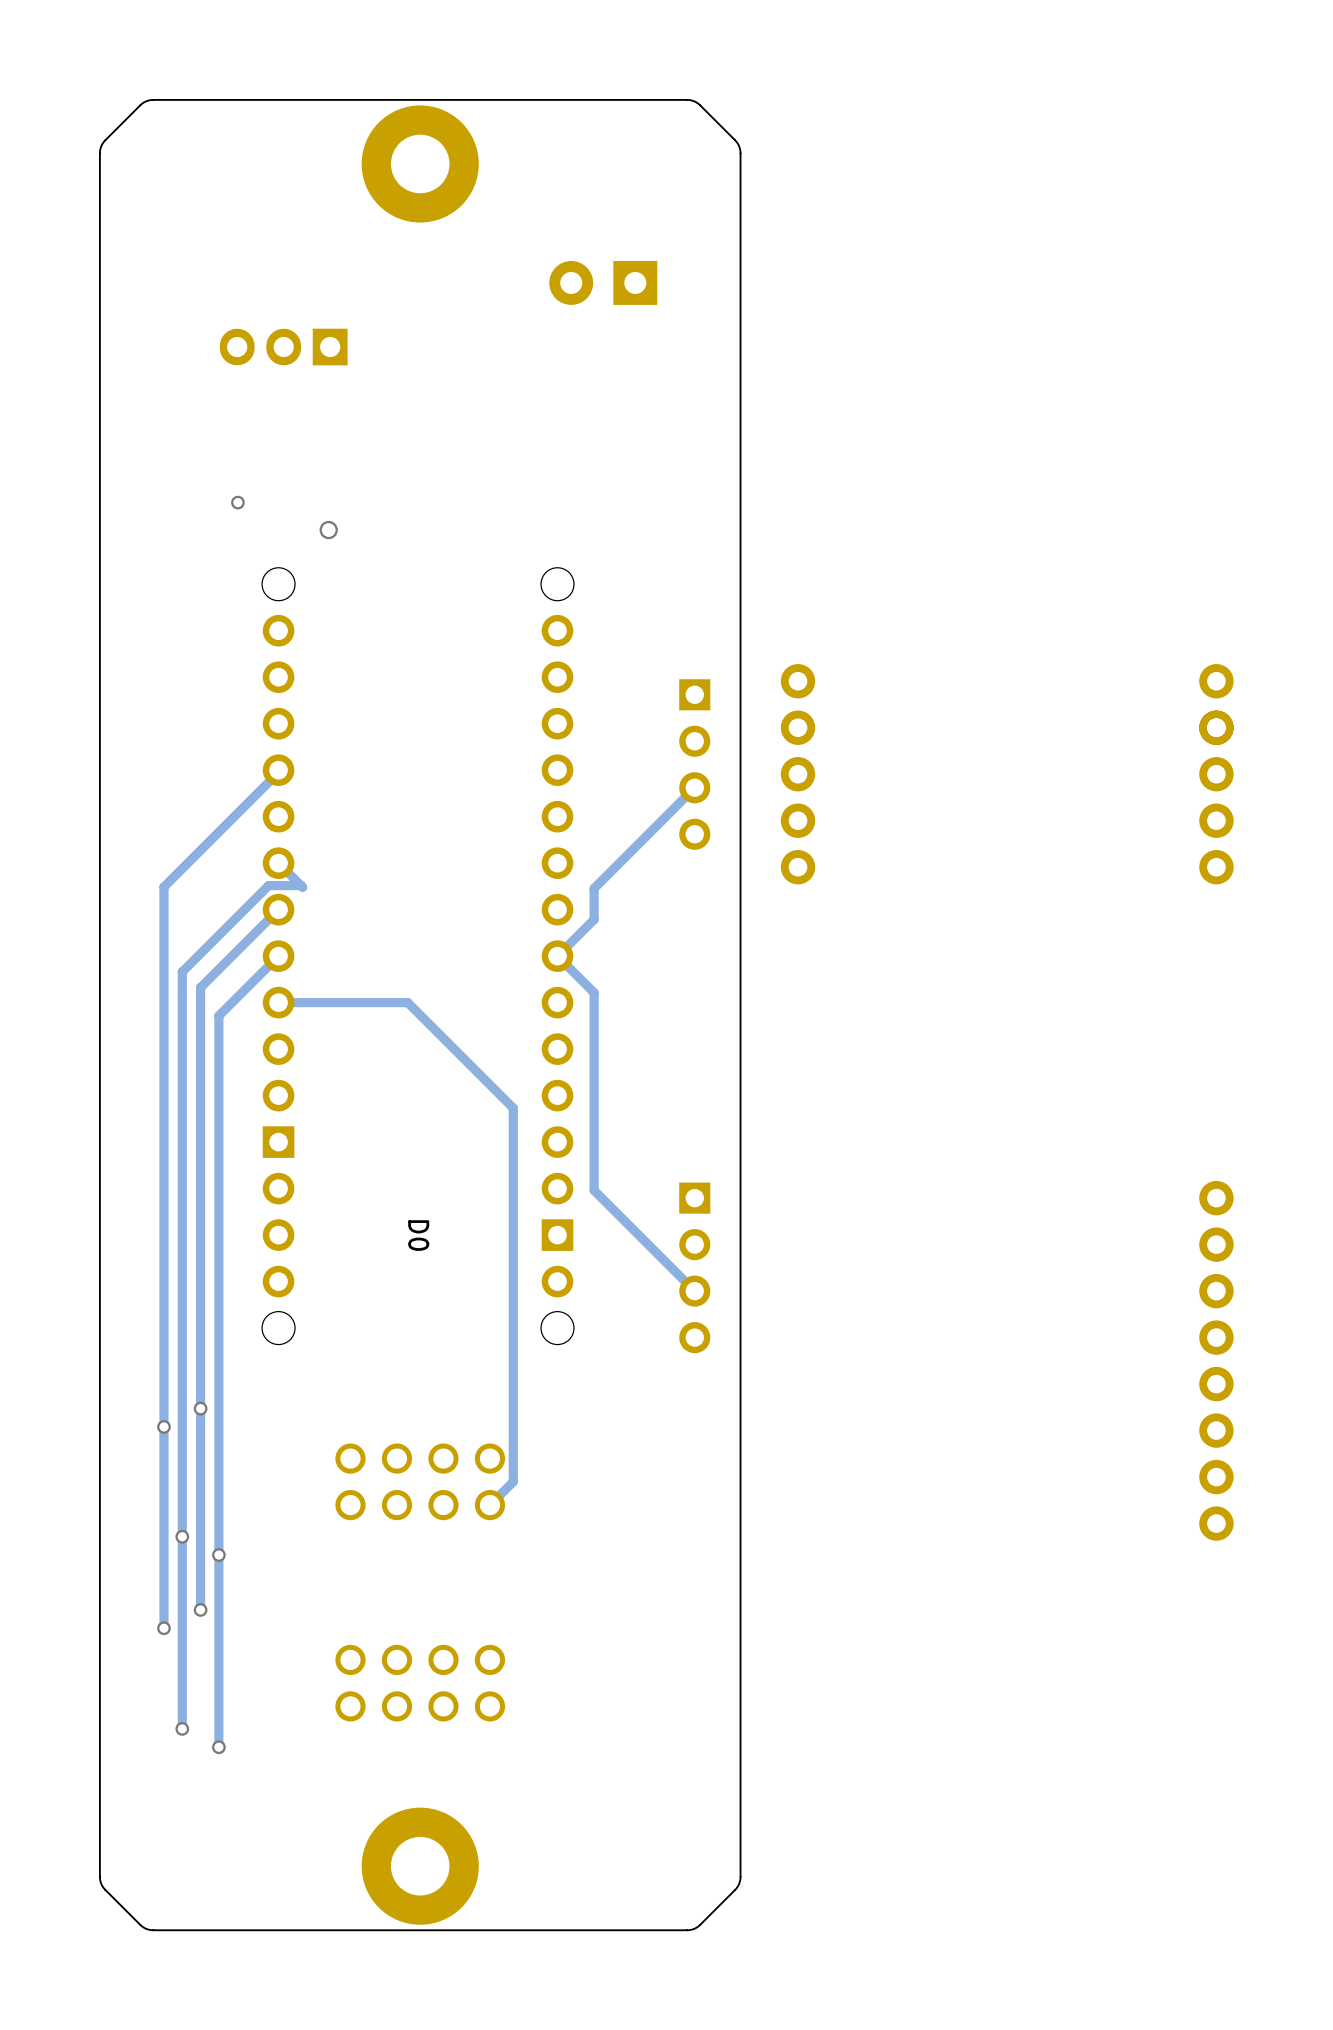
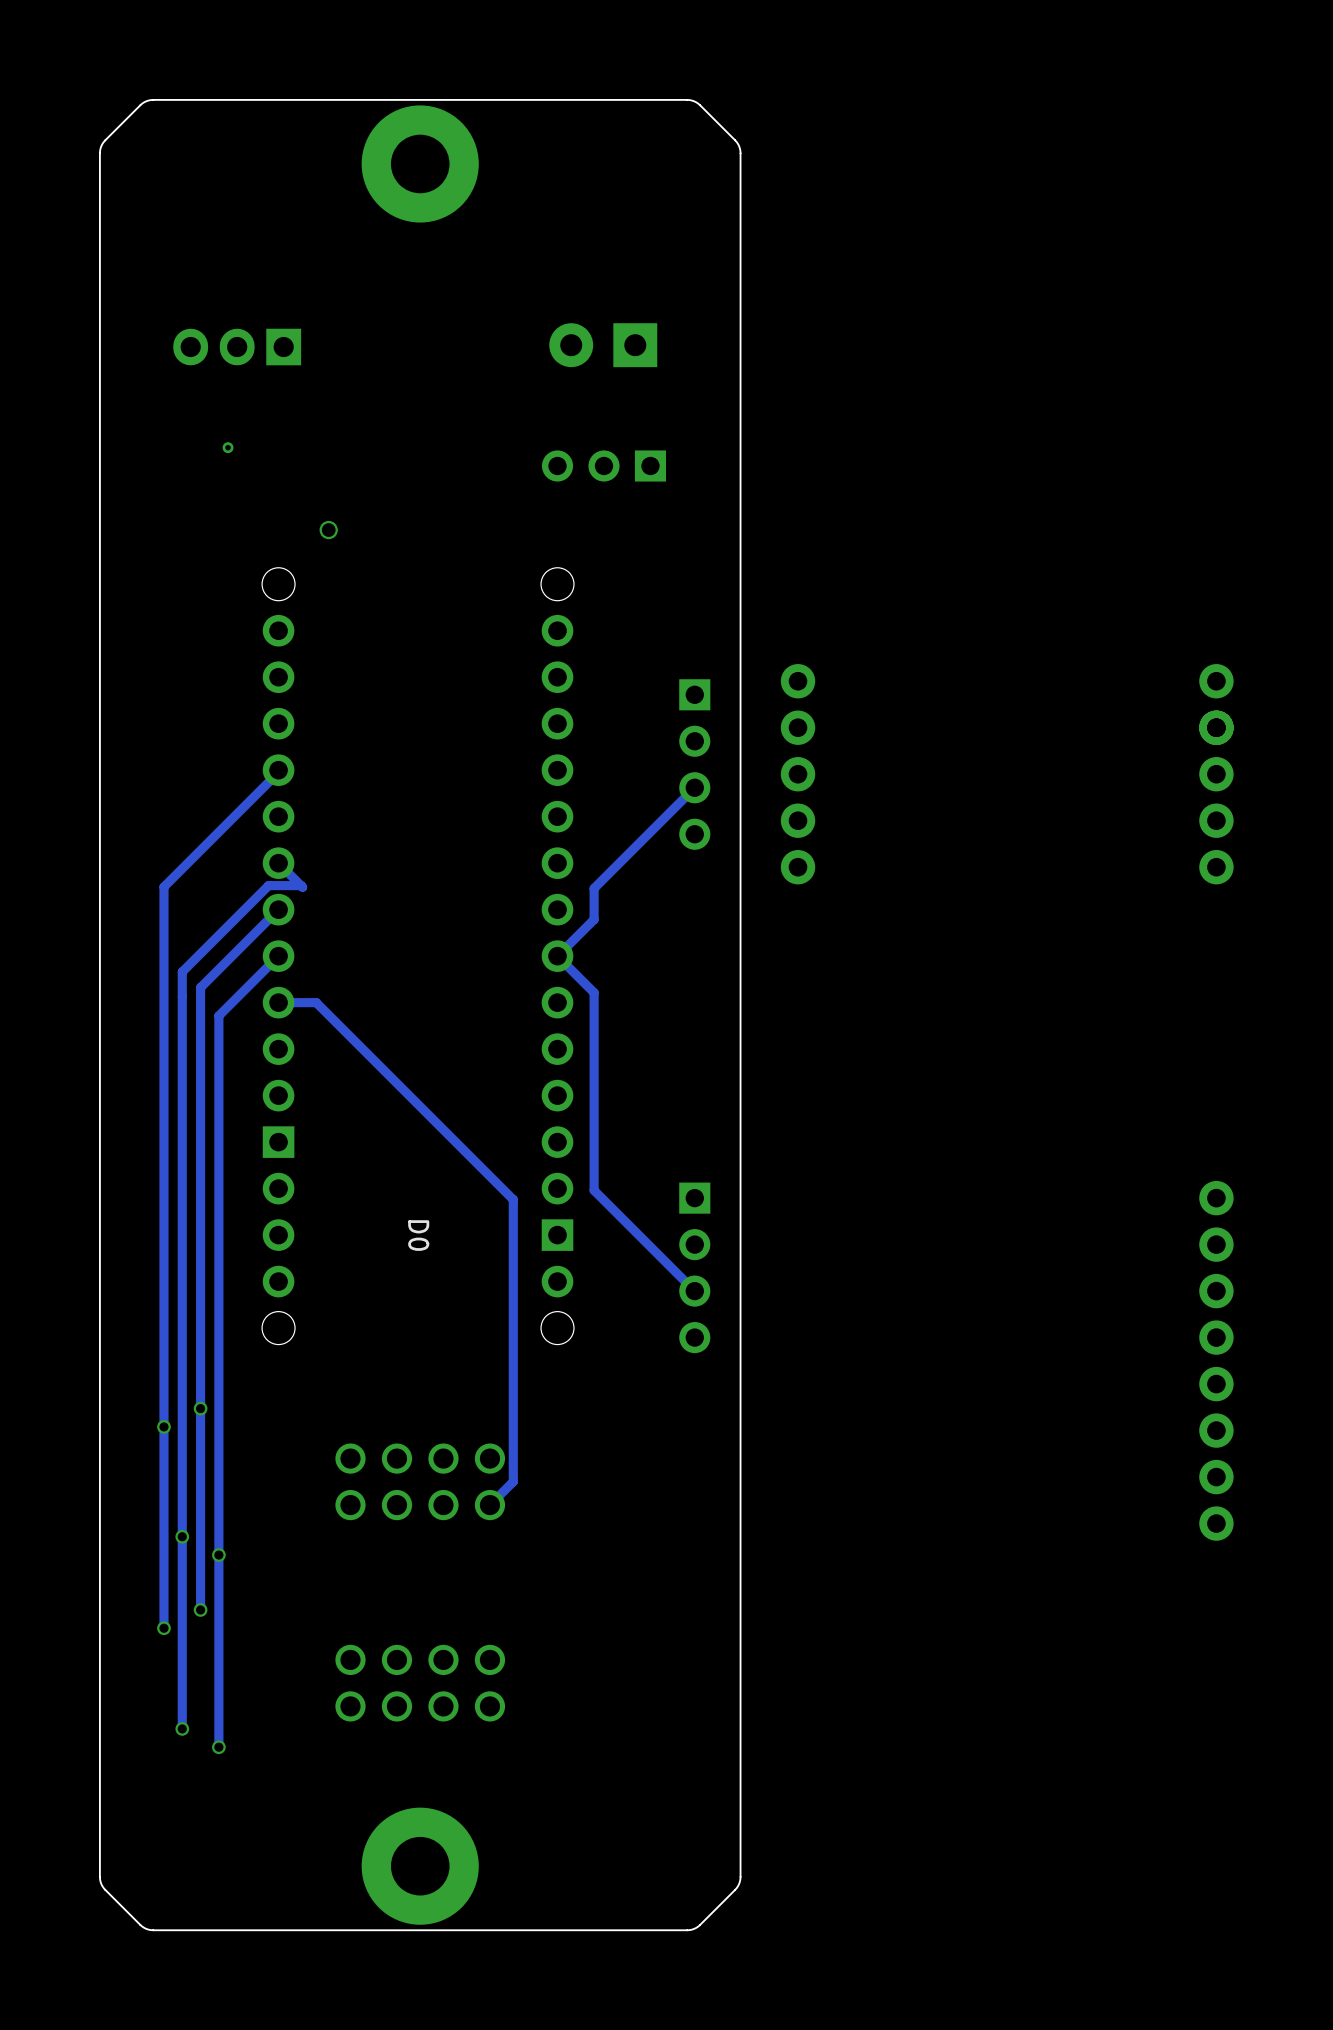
part position: (603, 282) -> (603, 345)
part position: (283, 347) -> (237, 347)
via: none -> (228, 447)
part: none -> (603, 465)
via: (237, 502) -> none
track: (316, 1002) (407, 1002) (513, 1108) (513, 1199) -> (316, 1002) (513, 1199)

